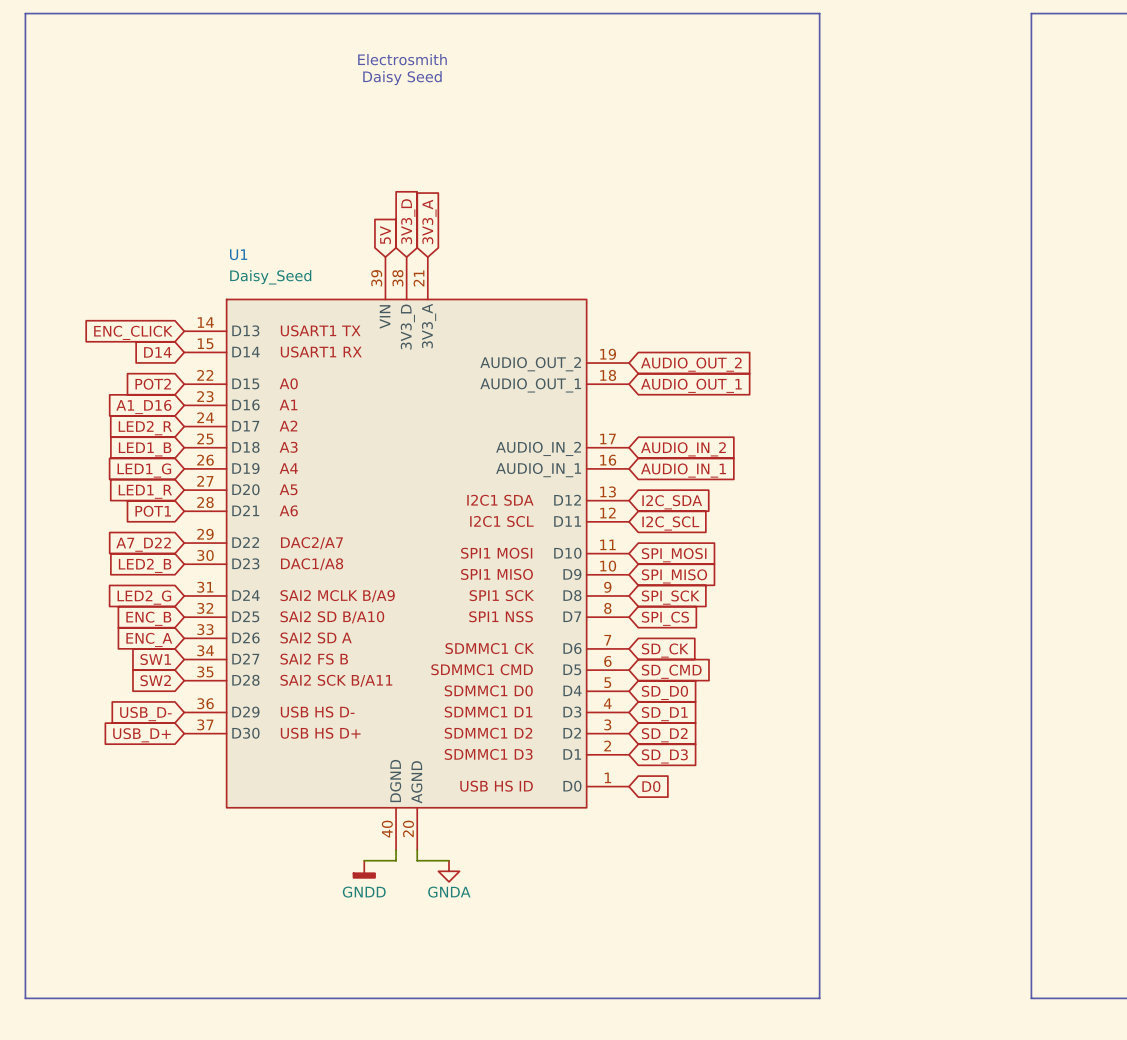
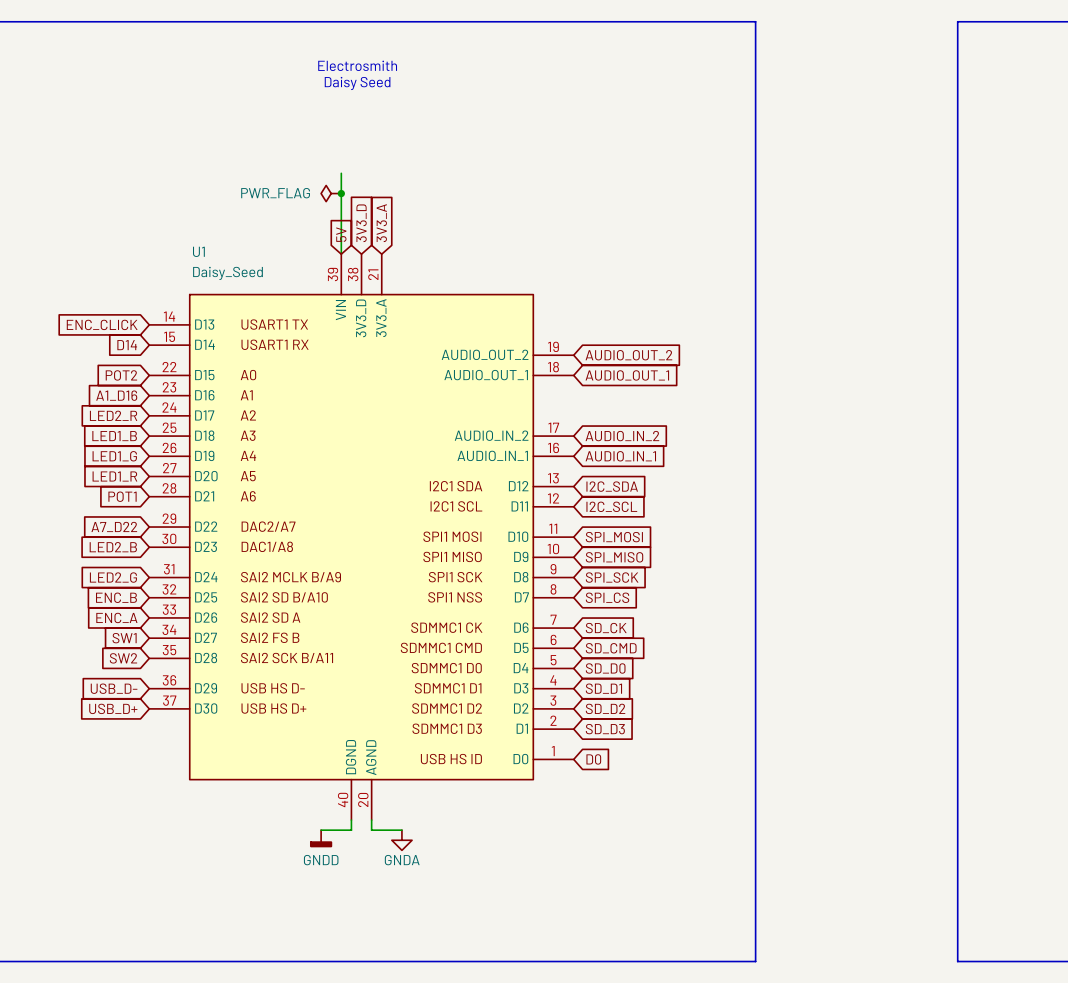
wire: none -> (341, 173) (341, 254)
power symbol: none -> PWR_FLAG (331, 193)
junction: none -> (341, 193)

